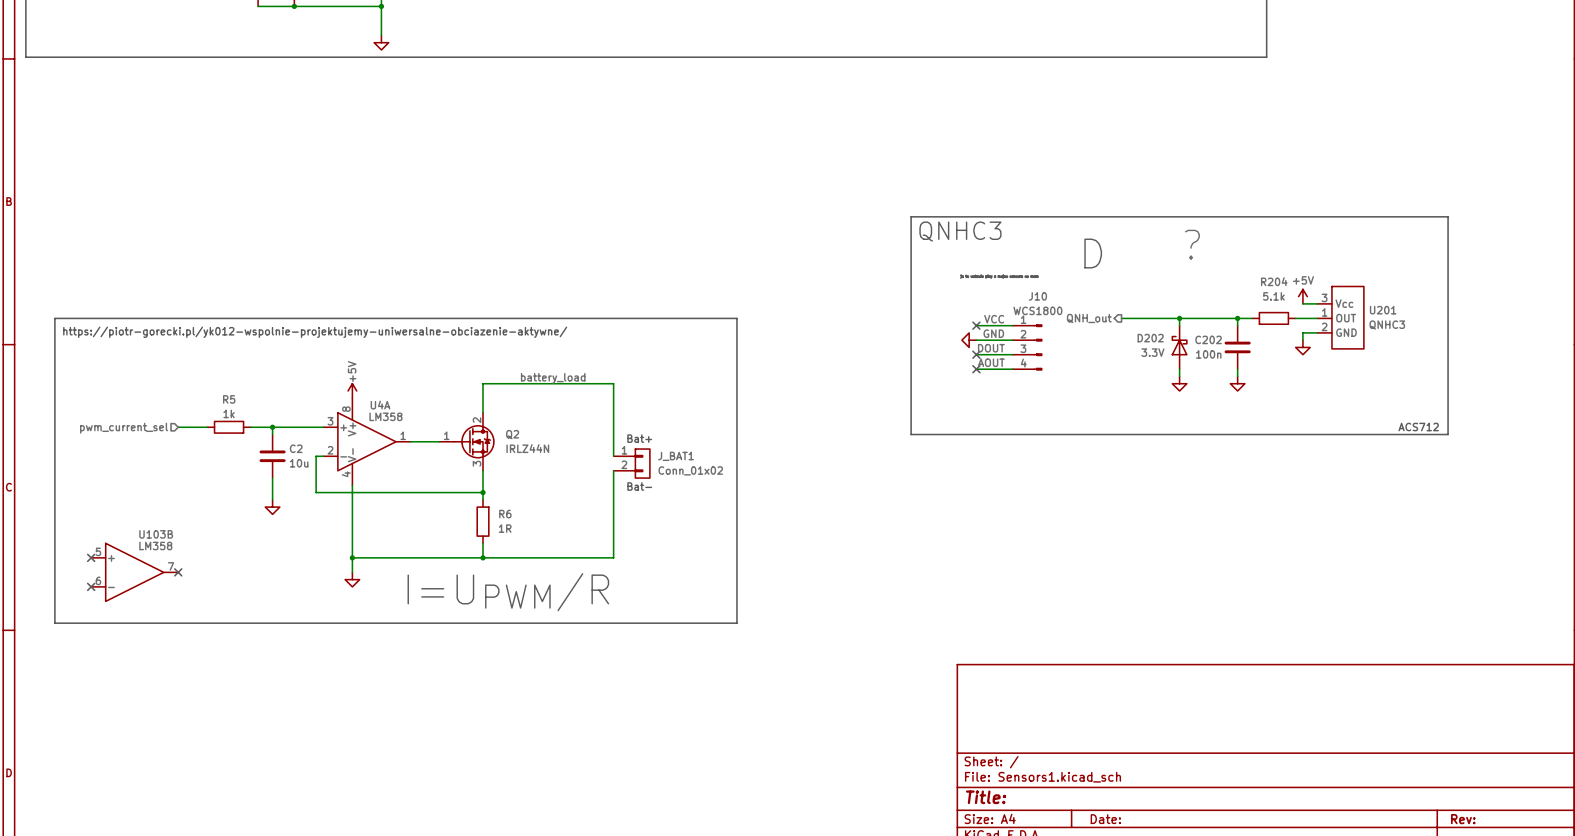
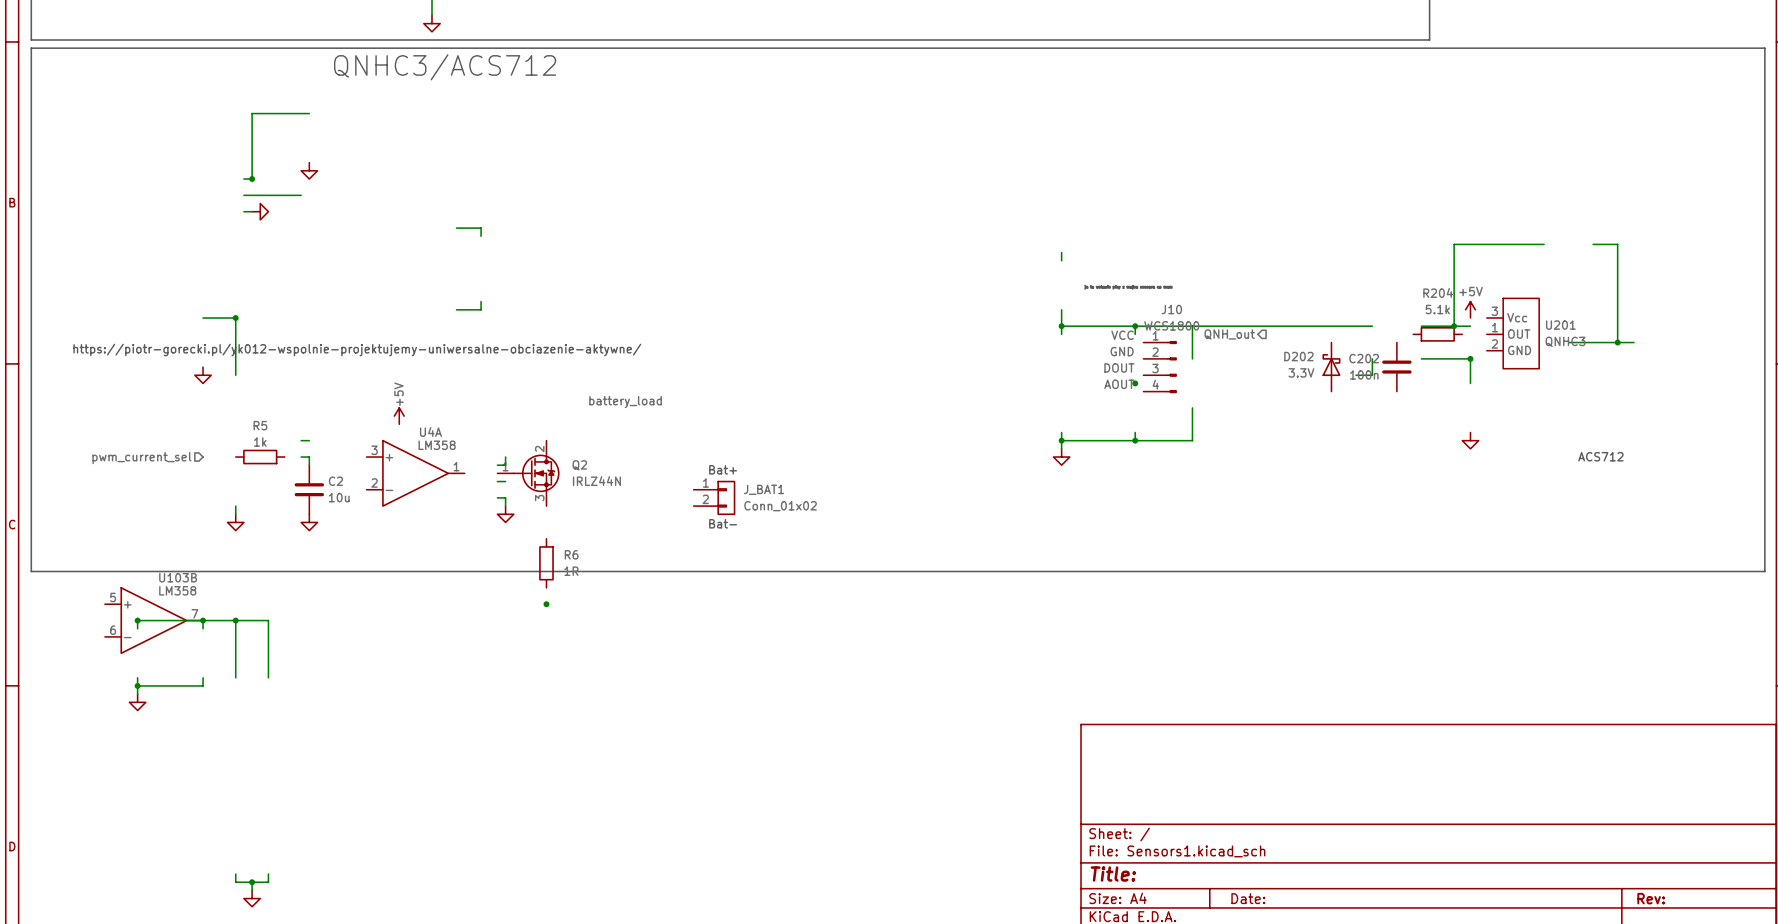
line: none -> (31, 48) (1764, 48) (1764, 571) (31, 571) (31, 48)
text: none -> QNHC3/ACS712 (445, 67)
wire: none -> (309, 113) (252, 113) (252, 179) (243, 179)
power symbol: none -> (309, 170)
junction: none -> (252, 179)
wire: none -> (243, 195) (301, 195)
wire: none -> (243, 211) (252, 211)
power symbol: none -> (260, 211)
line: (911, 216) (1448, 216) (1448, 434) (911, 434) (911, 216) -> none
wire: none -> (456, 228) (481, 228) (481, 236)
text: QNHC3 (960, 231) -> none
wire: none -> (1544, 244) (1454, 244) (1454, 326)
wire: none -> (1593, 244) (1617, 244) (1617, 342)
label: ? (1192, 244) -> none
wire: none -> (1061, 252) (1061, 260)
text: D (1093, 253) -> none
wire: none -> (481, 301) (481, 309) (456, 309)
wire: none -> (1061, 309) (1061, 334)
wire: none -> (203, 318) (235, 318) (235, 375)
junction: none -> (235, 318)
wire: (1302, 303) (1317, 303) -> none
wire: none -> (1061, 326) (1372, 326)
junction: none -> (1061, 326)
wire: none -> (1135, 326) (1135, 334)
junction: none -> (1135, 326)
wire: none -> (1192, 326) (1192, 358)
wire: none -> (1421, 326) (1470, 326)
junction: none -> (1454, 326)
line: (54, 318) (736, 318) (736, 623) (54, 623) (54, 318) -> none
wire: (1121, 318) (1252, 318) -> none
wire: (1179, 318) (1179, 325) -> none
junction: (1179, 318) -> none
wire: (1237, 318) (1237, 325) -> none
junction: (1237, 318) -> none
wire: (1295, 318) (1317, 318) -> none
wire: (976, 325) (1012, 325) -> none
no-connect mark: (976, 325) -> none
wire: none -> (1568, 342) (1634, 342)
junction: none -> (1617, 342)
wire: (1317, 332) (1302, 332) (1302, 340) -> none
power symbol rotation: 0° (969, 340) -> 90° counterclockwise (1061, 457)
power symbol position: (969, 340) -> (1061, 457)
wire: (976, 340) (1012, 340) -> none
wire: none -> (1372, 358) (1372, 375) (1356, 375)
wire: none -> (1421, 358) (1470, 358) (1470, 383)
junction: none -> (1470, 358)
power symbol: (1302, 347) -> none
power symbol: none -> (203, 375)
wire: (976, 354) (1012, 354) -> none
no-connect mark: (976, 354) -> none
junction: none -> (1135, 383)
wire: (976, 369) (1012, 369) -> none
no-connect mark: (976, 369) -> none
wire: (1179, 369) (1179, 376) -> none
wire: (1237, 369) (1237, 376) -> none
wire: none -> (1192, 407) (1192, 440) (1061, 440)
power symbol: (1179, 383) -> none
power symbol: (1237, 383) -> none
wire: none -> (1061, 432) (1061, 448)
wire: none -> (1135, 432) (1135, 440)
wire: none -> (301, 440) (309, 440)
wire: (483, 412) (483, 383) (613, 383) (613, 456) -> none
junction: none -> (1061, 440)
junction: none -> (1135, 440)
power symbol: none -> (1470, 440)
wire: (178, 427) (207, 427) -> none
wire: (250, 427) (265, 427) -> none
wire: (272, 427) (323, 427) -> none
junction: (272, 427) -> none
wire: none -> (505, 457) (505, 465) (497, 465)
part: (352, 441) -> none
wire: (410, 441) (439, 441) -> none
wire: none -> (497, 481) (505, 481)
wire: (323, 456) (316, 456) (316, 492) (483, 492) -> none
wire: none -> (497, 497) (505, 497) (505, 506)
wire: none -> (235, 506) (235, 514)
wire: (483, 470) (483, 499) -> none
wire: (613, 470) (613, 557) (352, 557) -> none
wire: (272, 478) (272, 499) -> none
power symbol: none -> (505, 514)
power symbol: none -> (235, 522)
wire: (352, 485) (352, 572) -> none
junction: (483, 492) -> none
power symbol position: (272, 507) -> (309, 522)
wire: (483, 543) (483, 557) -> none
no-connect mark: (91, 557) -> none
junction: (352, 557) -> none
junction: none -> (137, 620)
wire: none -> (203, 620) (203, 628)
junction: none -> (203, 620)
no-connect mark: (178, 572) -> none
wire: none -> (235, 620) (235, 677)
junction: none -> (235, 620)
wire: none -> (137, 628) (137, 620) (268, 620) (268, 677)
power symbol: (352, 579) -> none
no-connect mark: (91, 586) -> none
text: I=UPWM/R (508, 592) -> none
wire: none -> (137, 677) (137, 694)
wire: none -> (203, 677) (203, 685) (137, 685)
junction: none -> (137, 685)
power symbol: none -> (137, 702)
wire: none -> (235, 874) (235, 882) (268, 882) (268, 874)
wire: none -> (252, 882) (252, 890)
junction: none -> (252, 882)
power symbol: none -> (252, 898)

